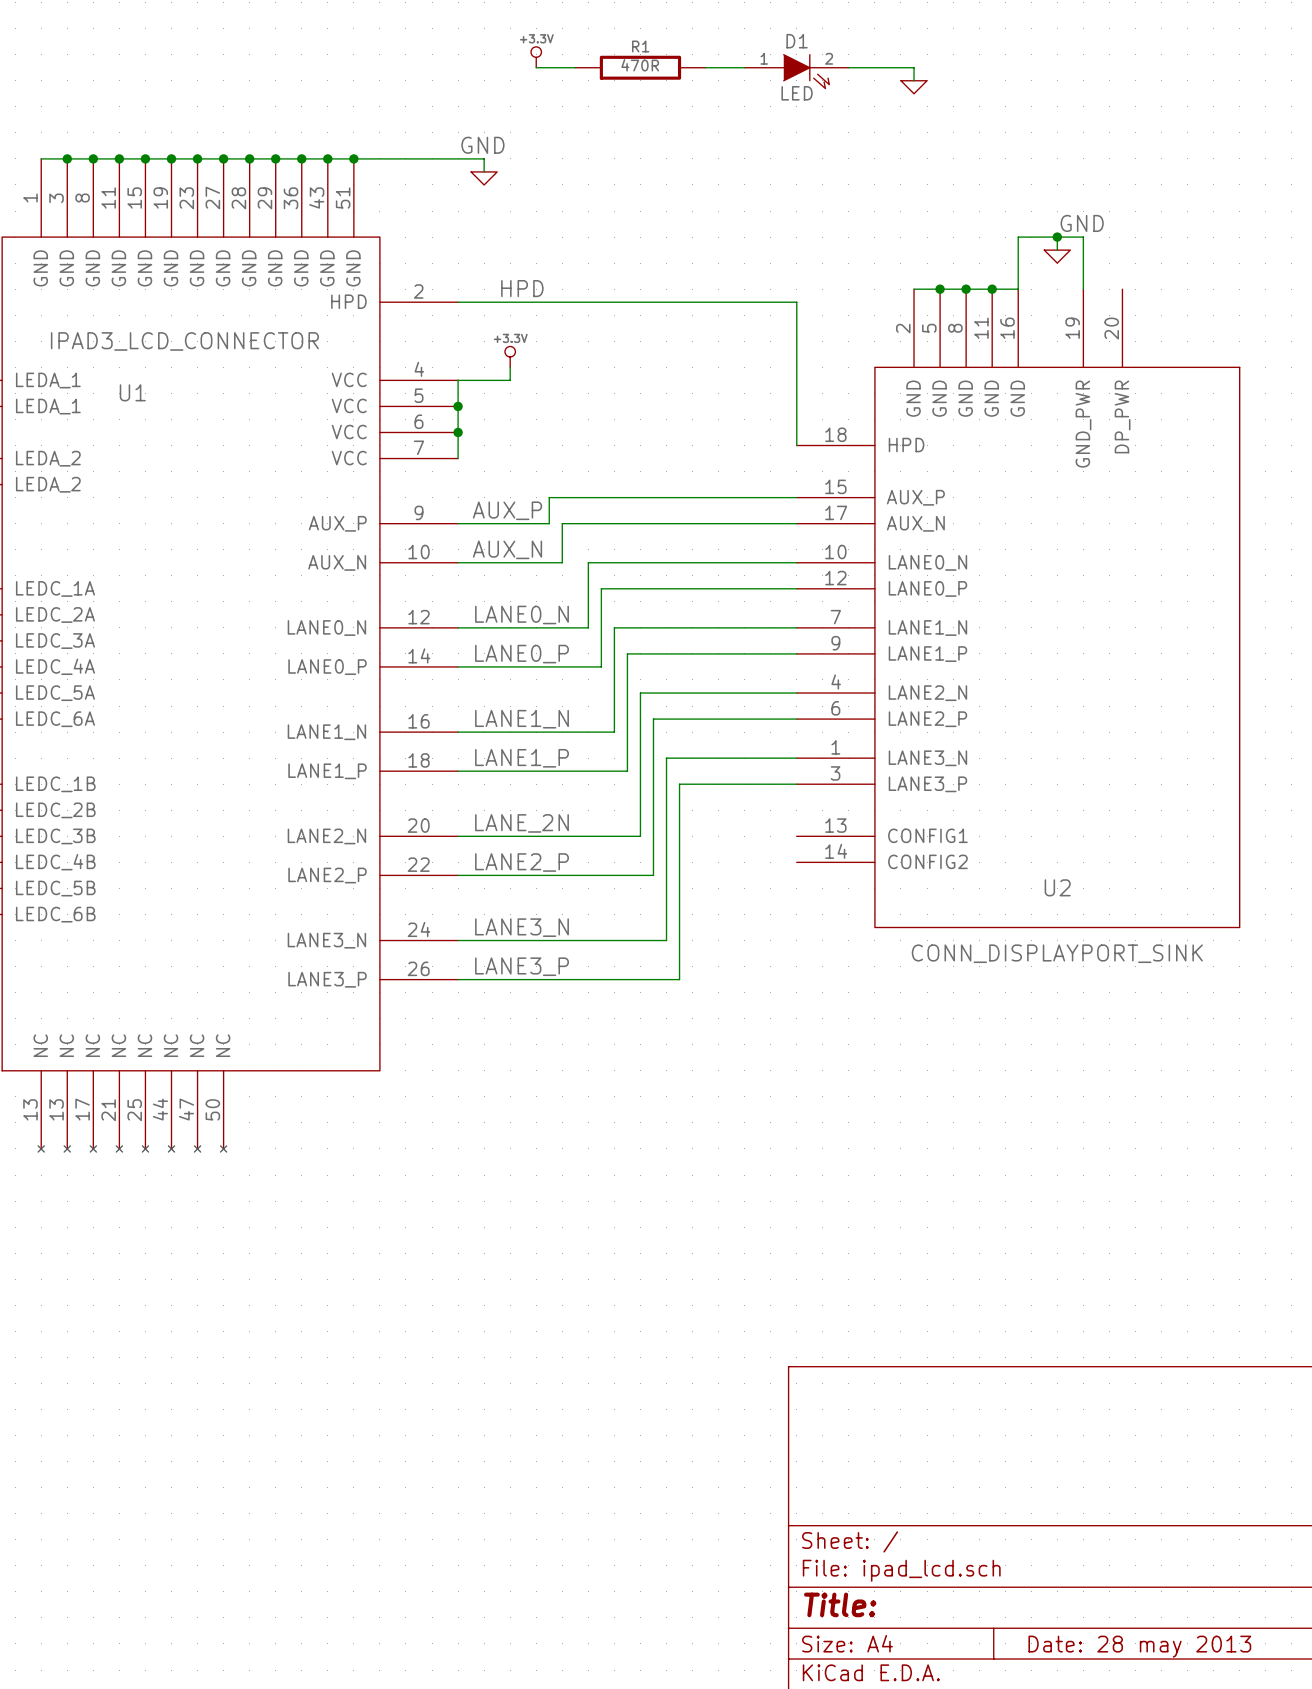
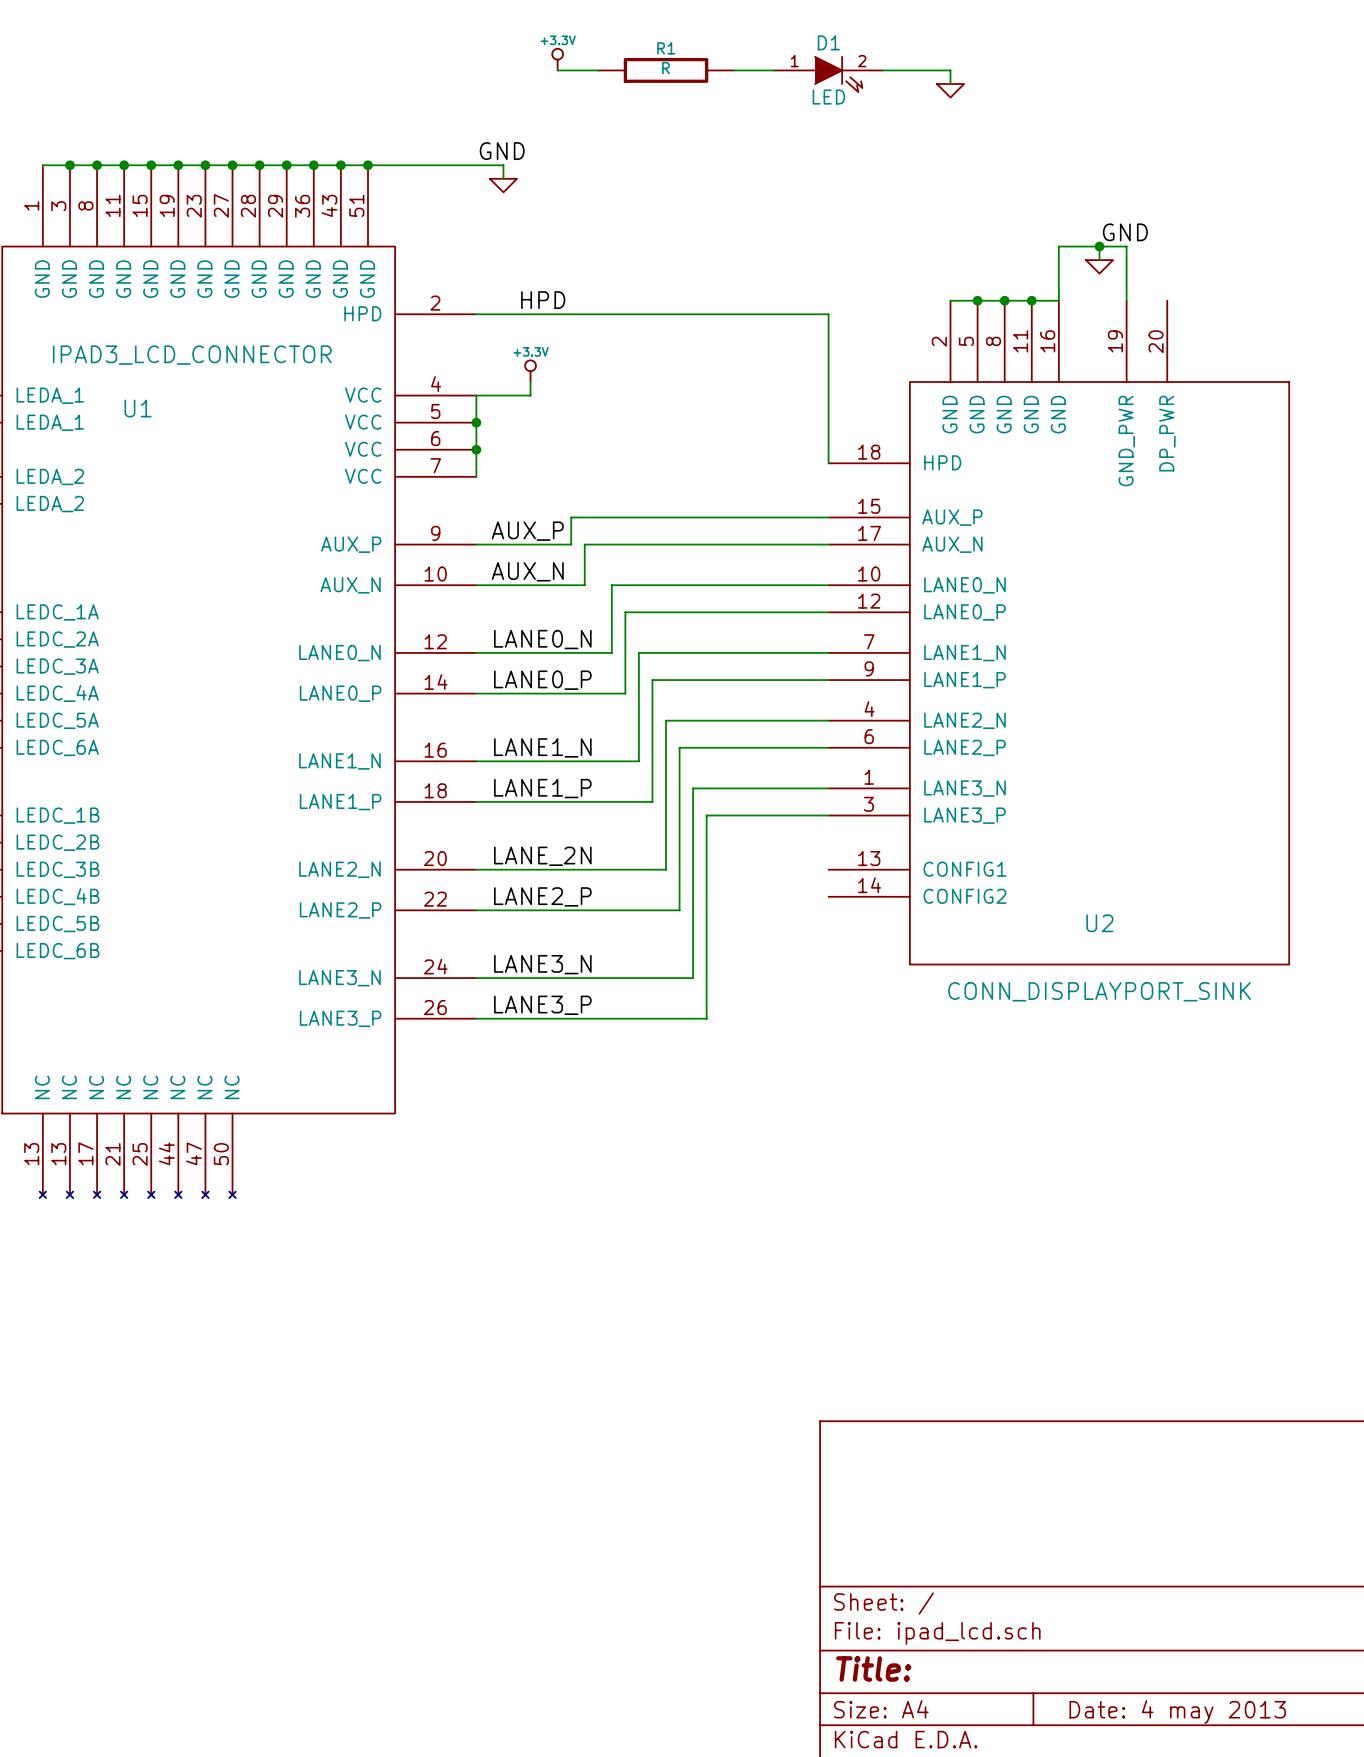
R1 value: 470R (640, 65) -> R (666, 68)
title block: Date: 28 may 2013 (1139, 1646) -> Date: 4 may 2013 (1177, 1711)

